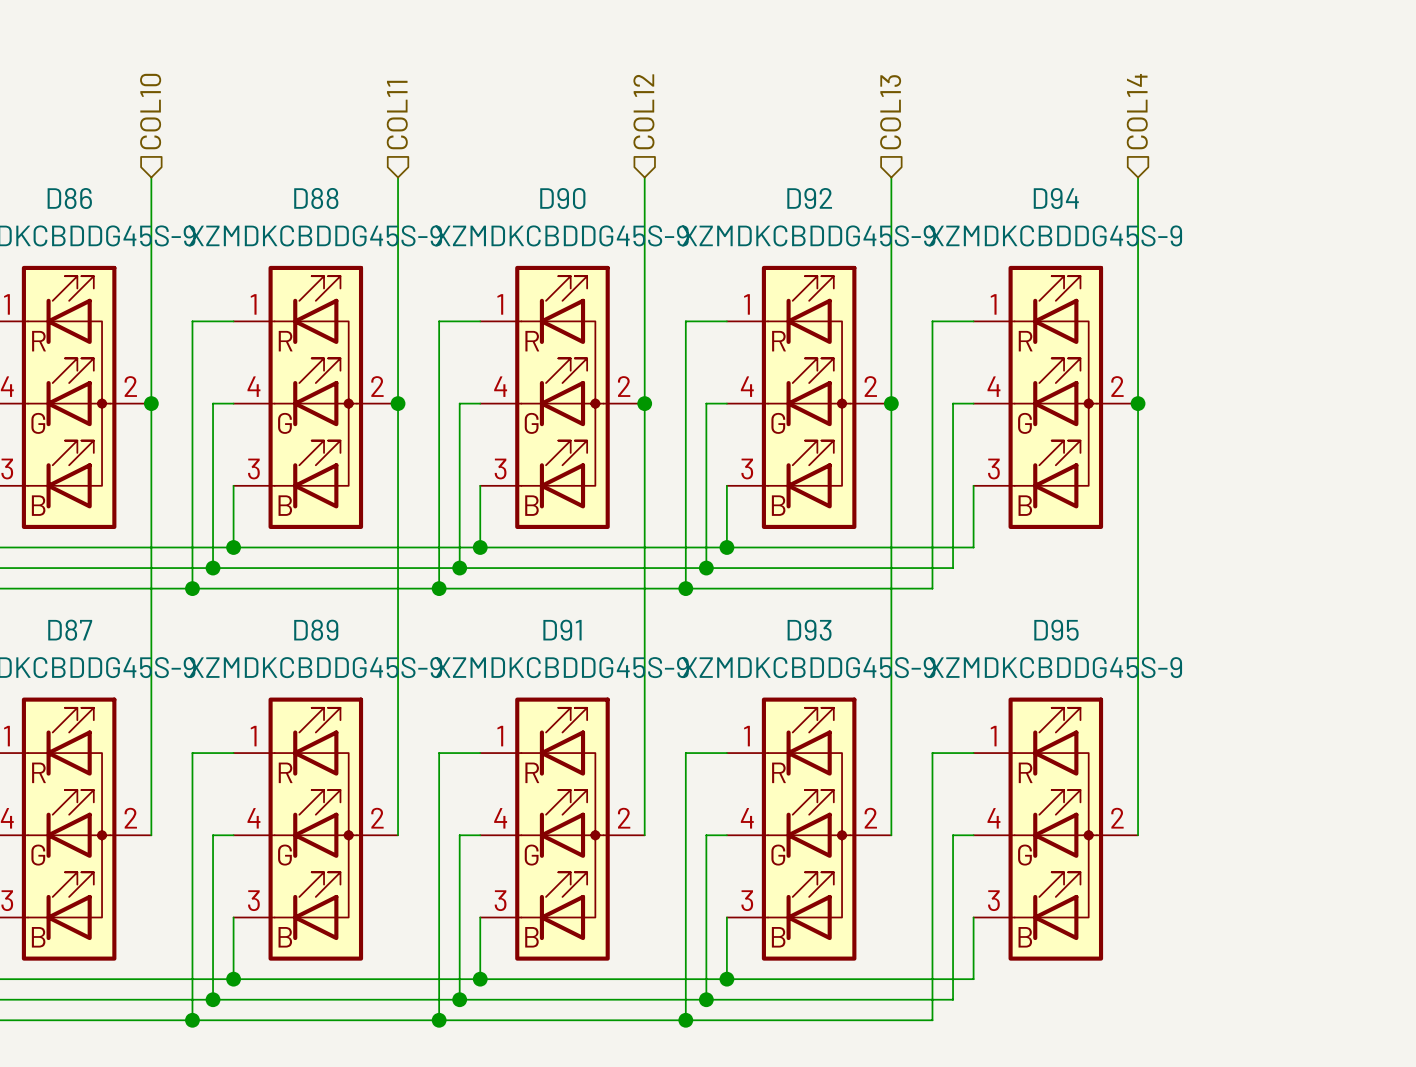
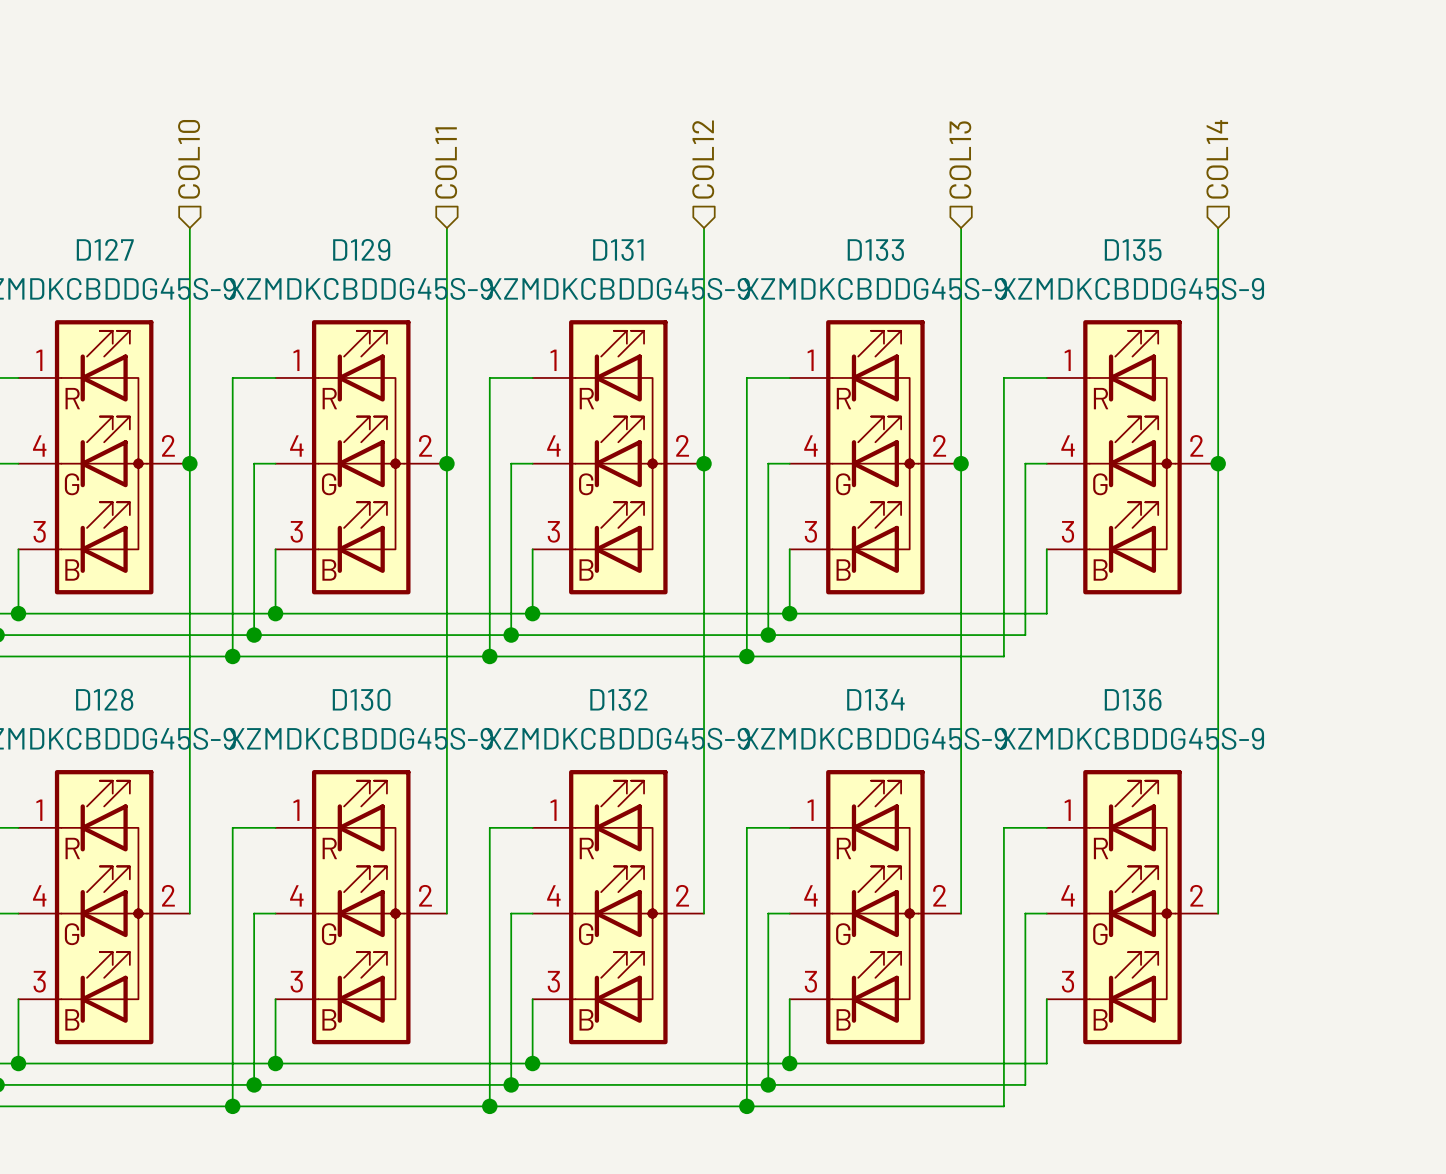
D86 name: D86 (69, 198) -> D127 (105, 249)
D88 name: D88 (316, 198) -> D129 (361, 249)
D90 name: D90 (562, 198) -> D131 (618, 250)
D92 name: D92 (809, 198) -> D133 (875, 250)
D94 name: D94 (1056, 198) -> D135 (1133, 250)
D87 name: D87 (70, 630) -> D128 (104, 699)
D89 name: D89 (316, 630) -> D130 (361, 699)
D91 name: D91 (562, 630) -> D132 (618, 699)
D93 name: D93 (809, 630) -> D134 (875, 699)
D95 name: D95 (1056, 630) -> D136 (1133, 699)

